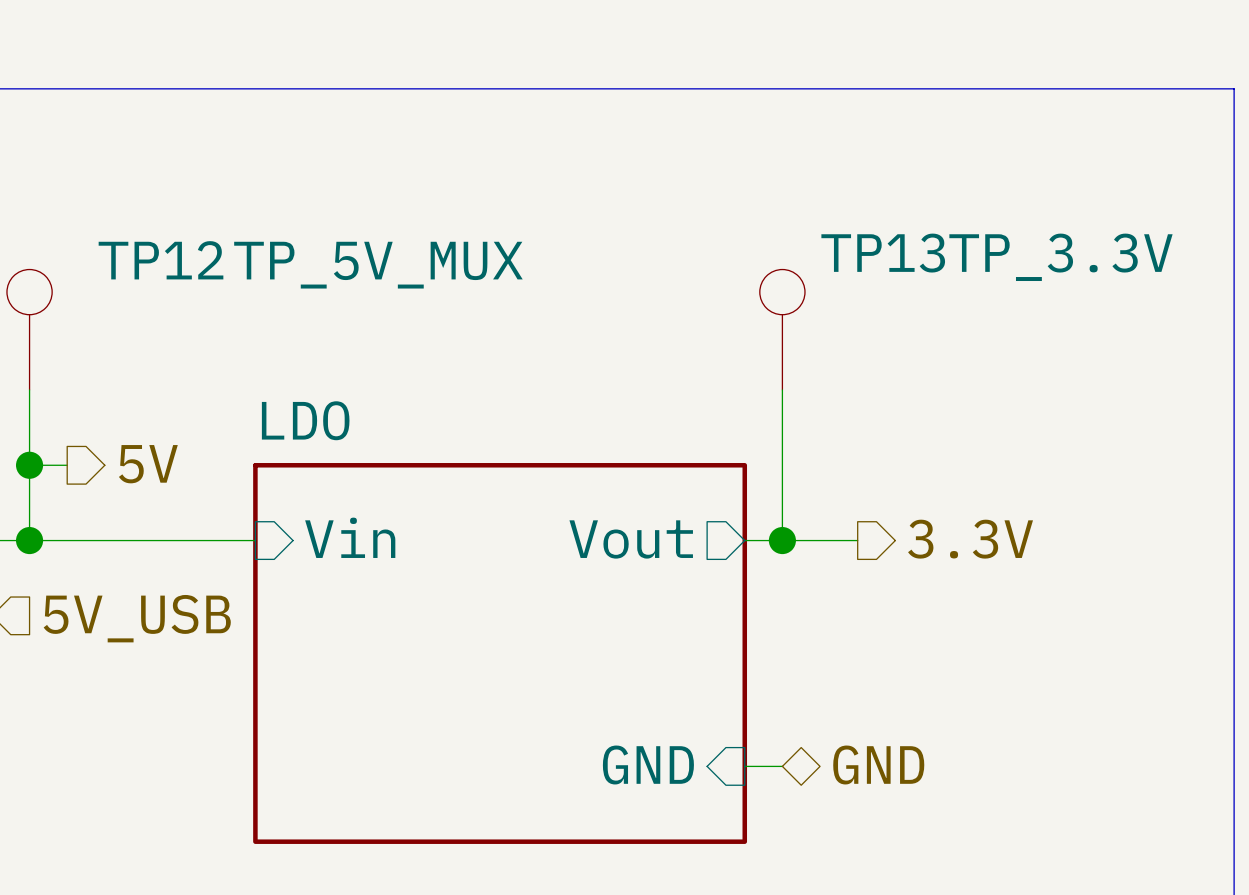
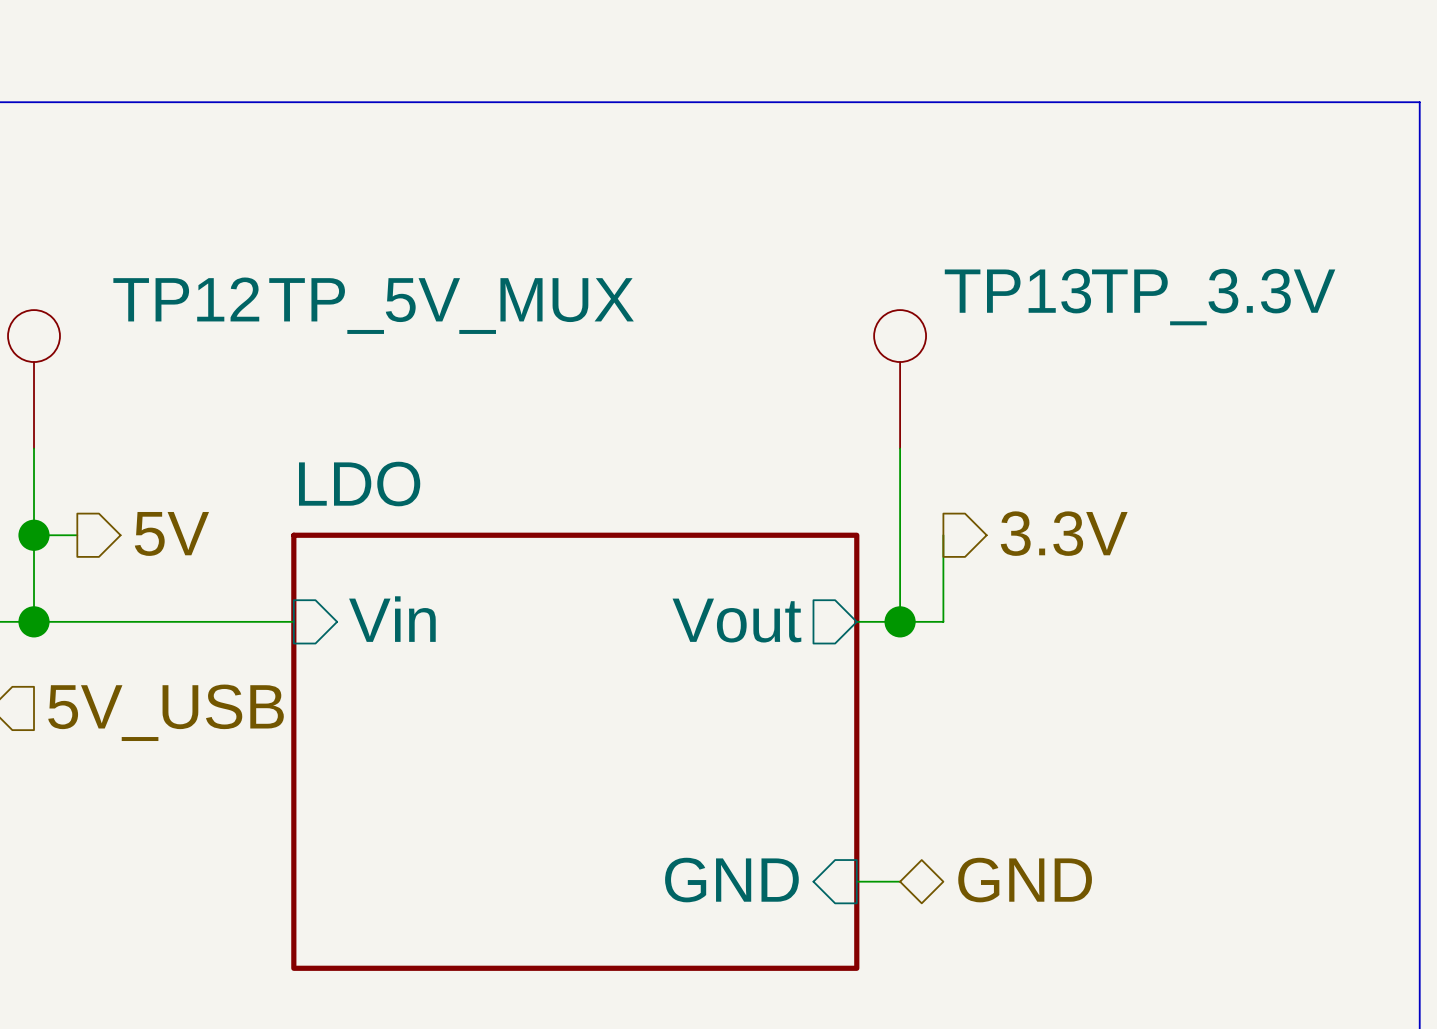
hierarchical label position: 3.3V (970, 539) -> 3.3V (1064, 533)
wire: (820, 540) (857, 540) -> (943, 621) (943, 535)

